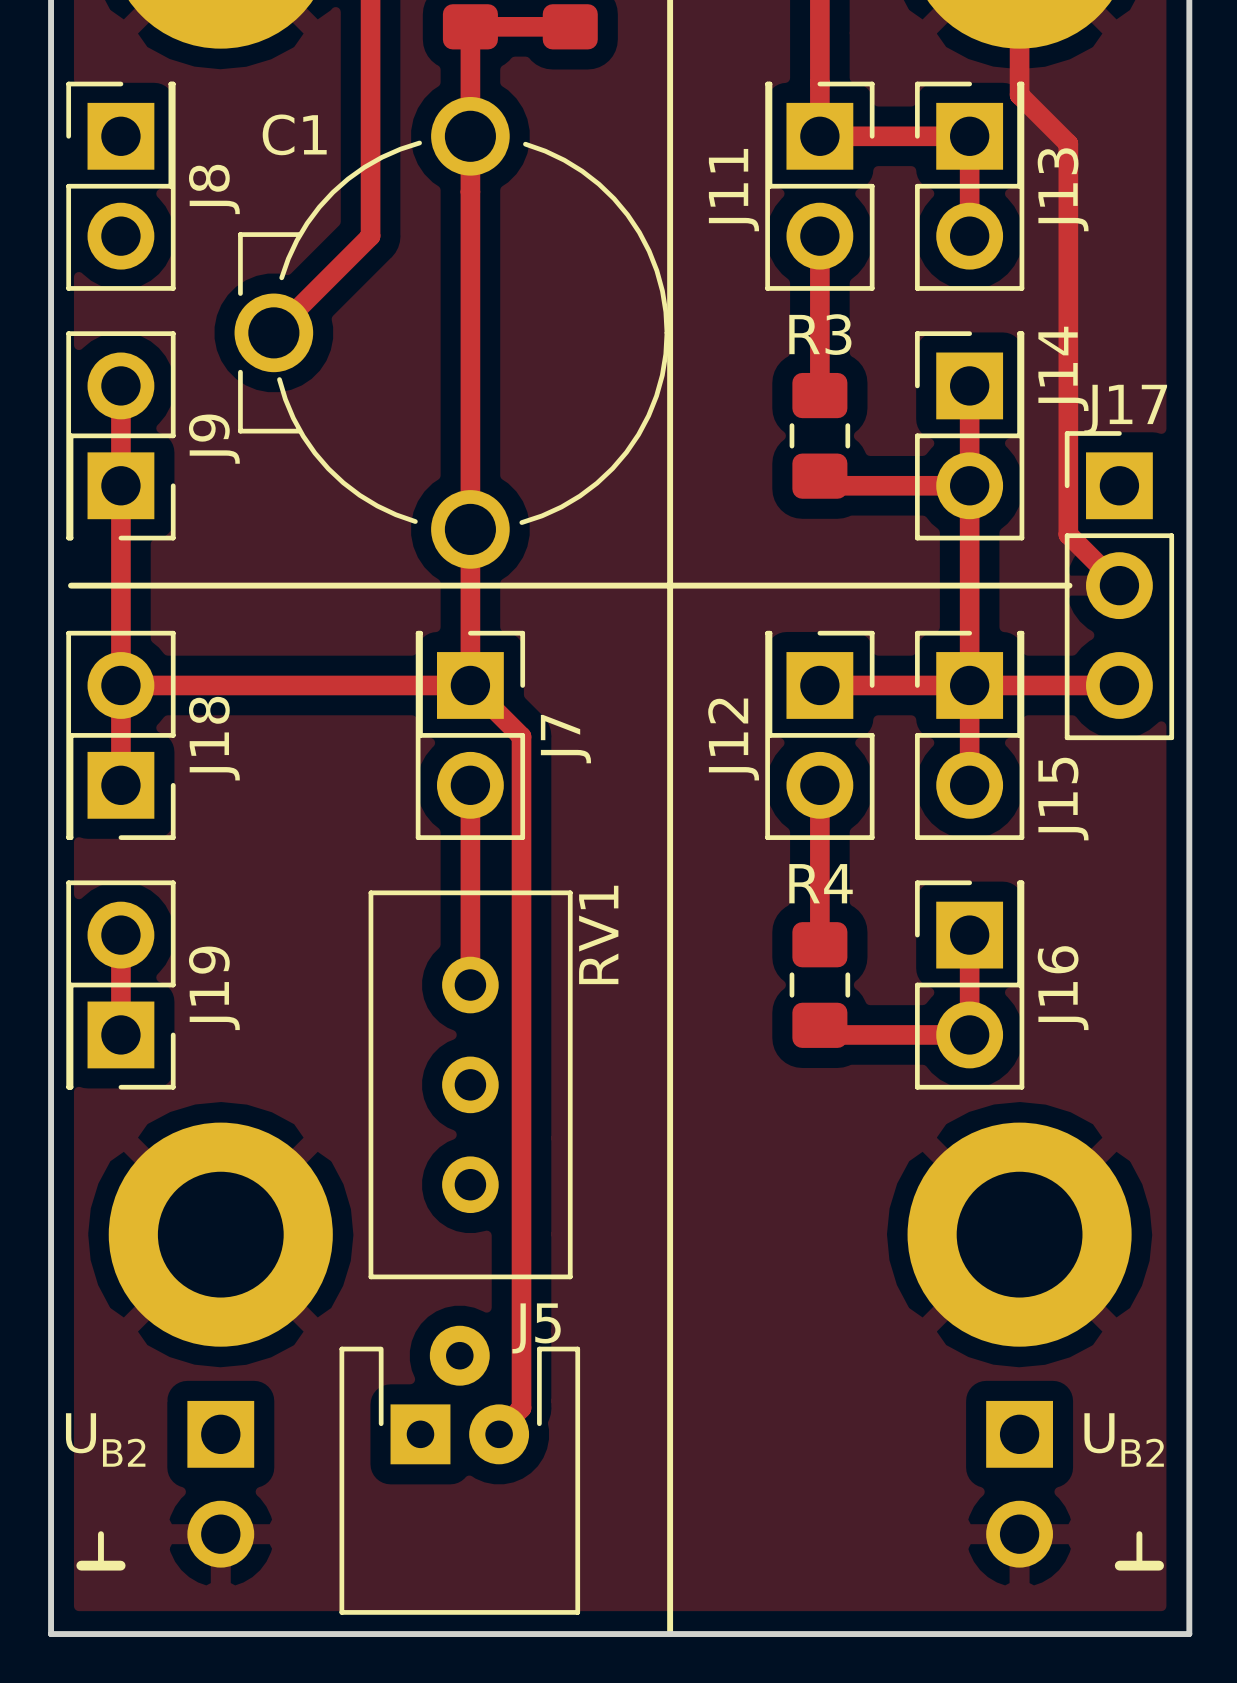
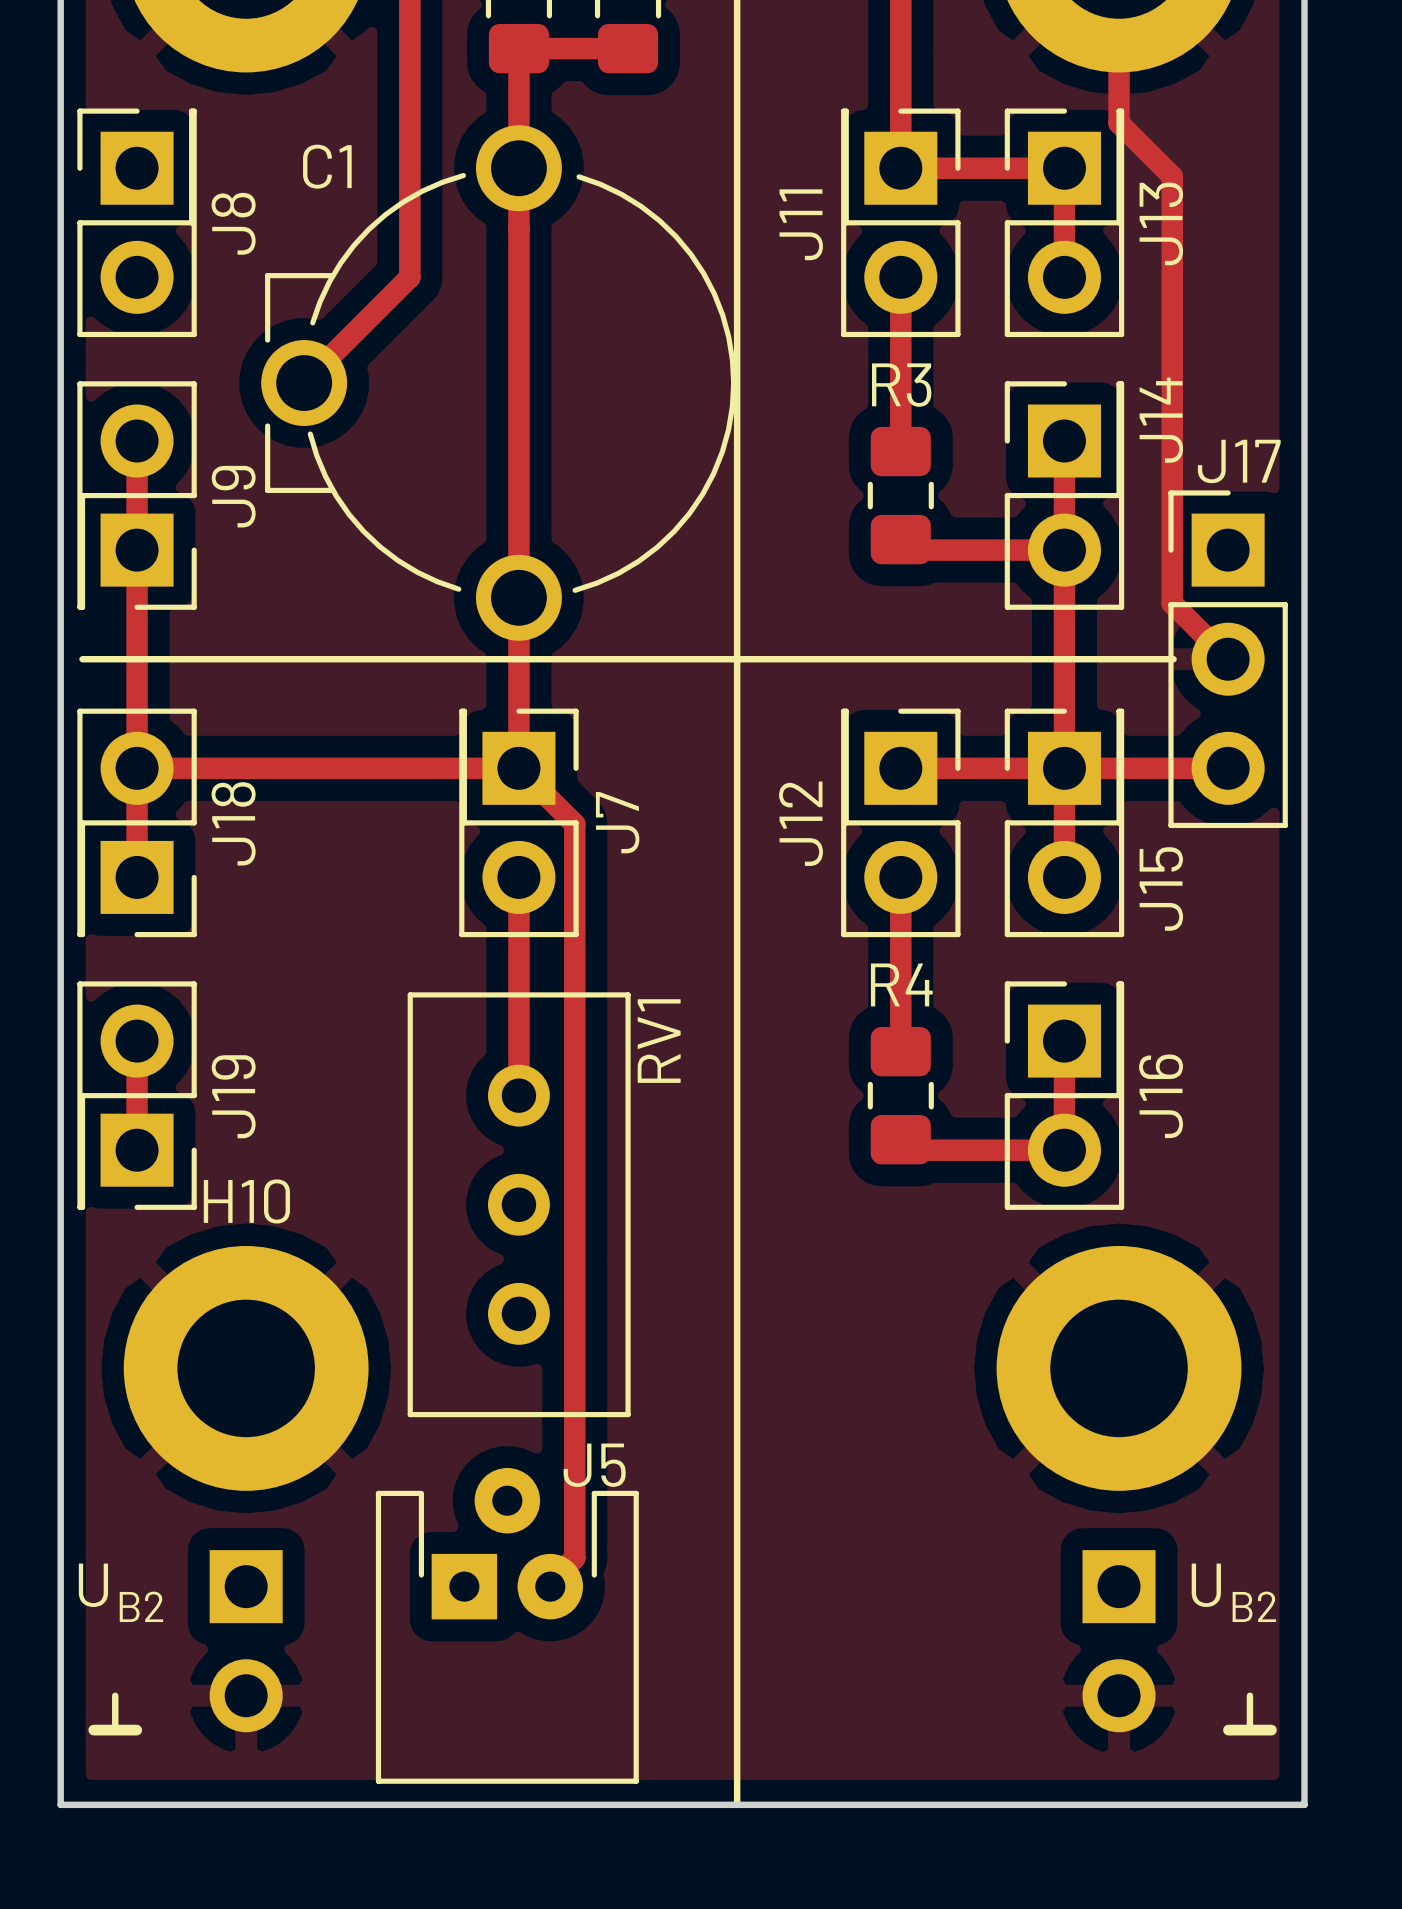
H10 name: none -> H10 (246, 1201)

